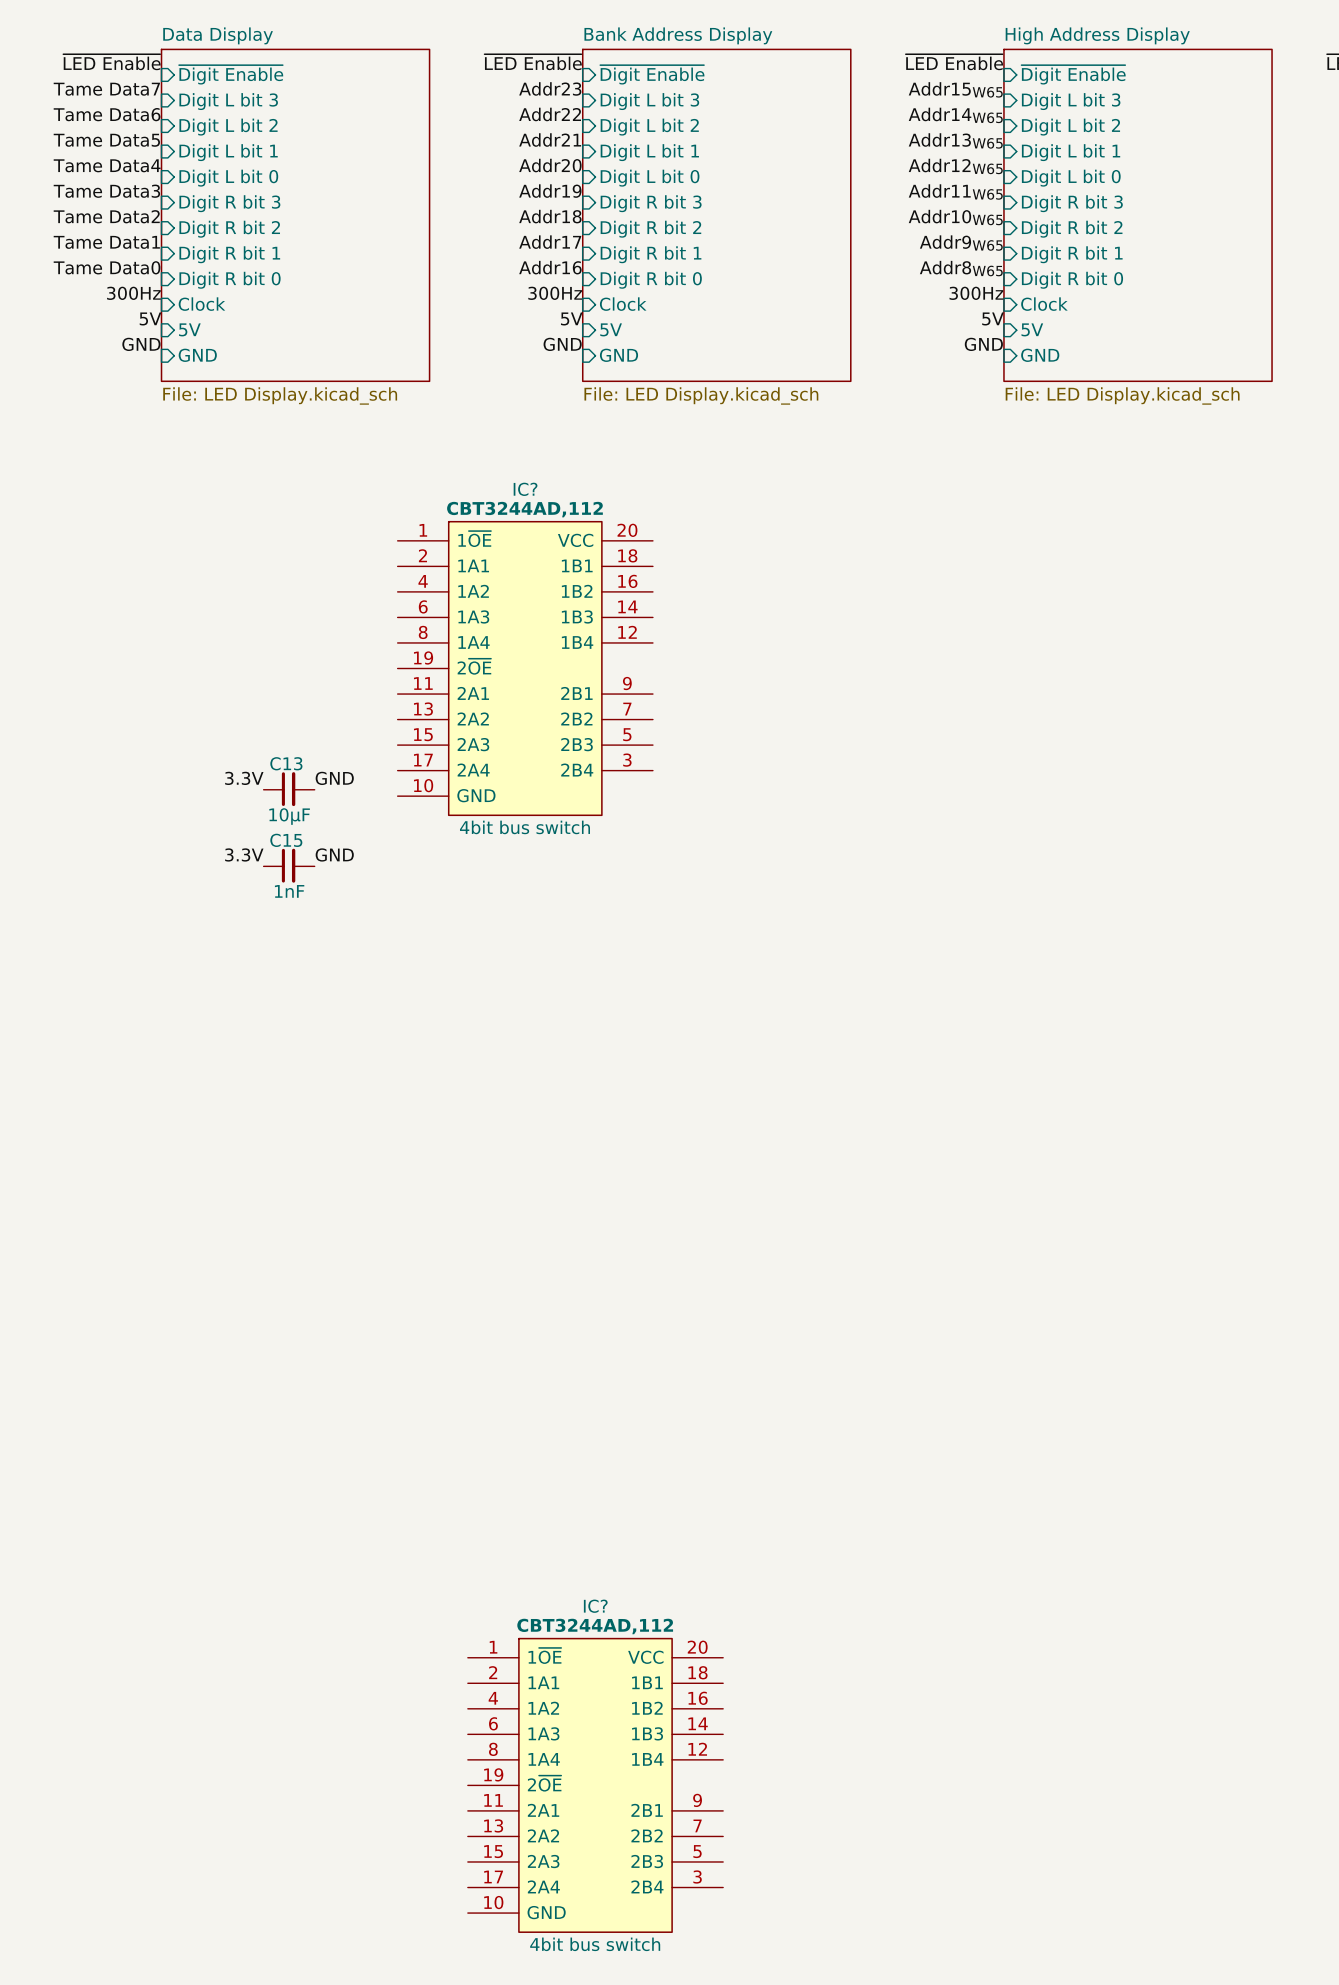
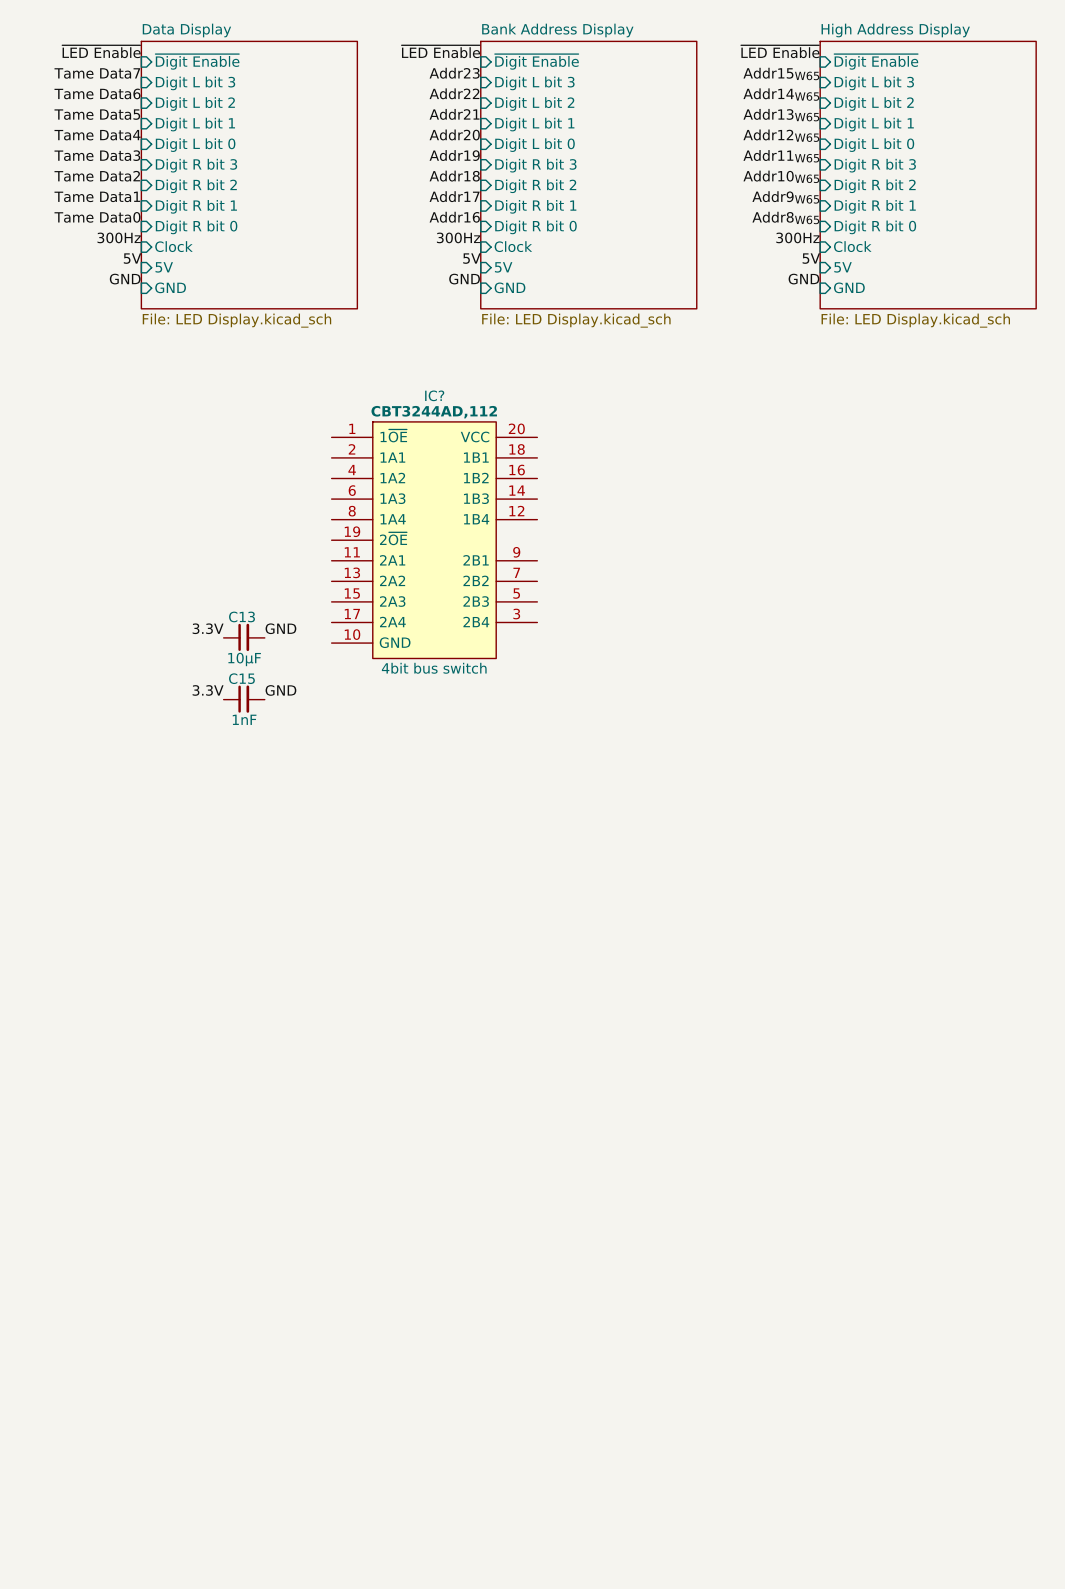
IC?: CBT3244AD,112 (595, 1785) -> none

